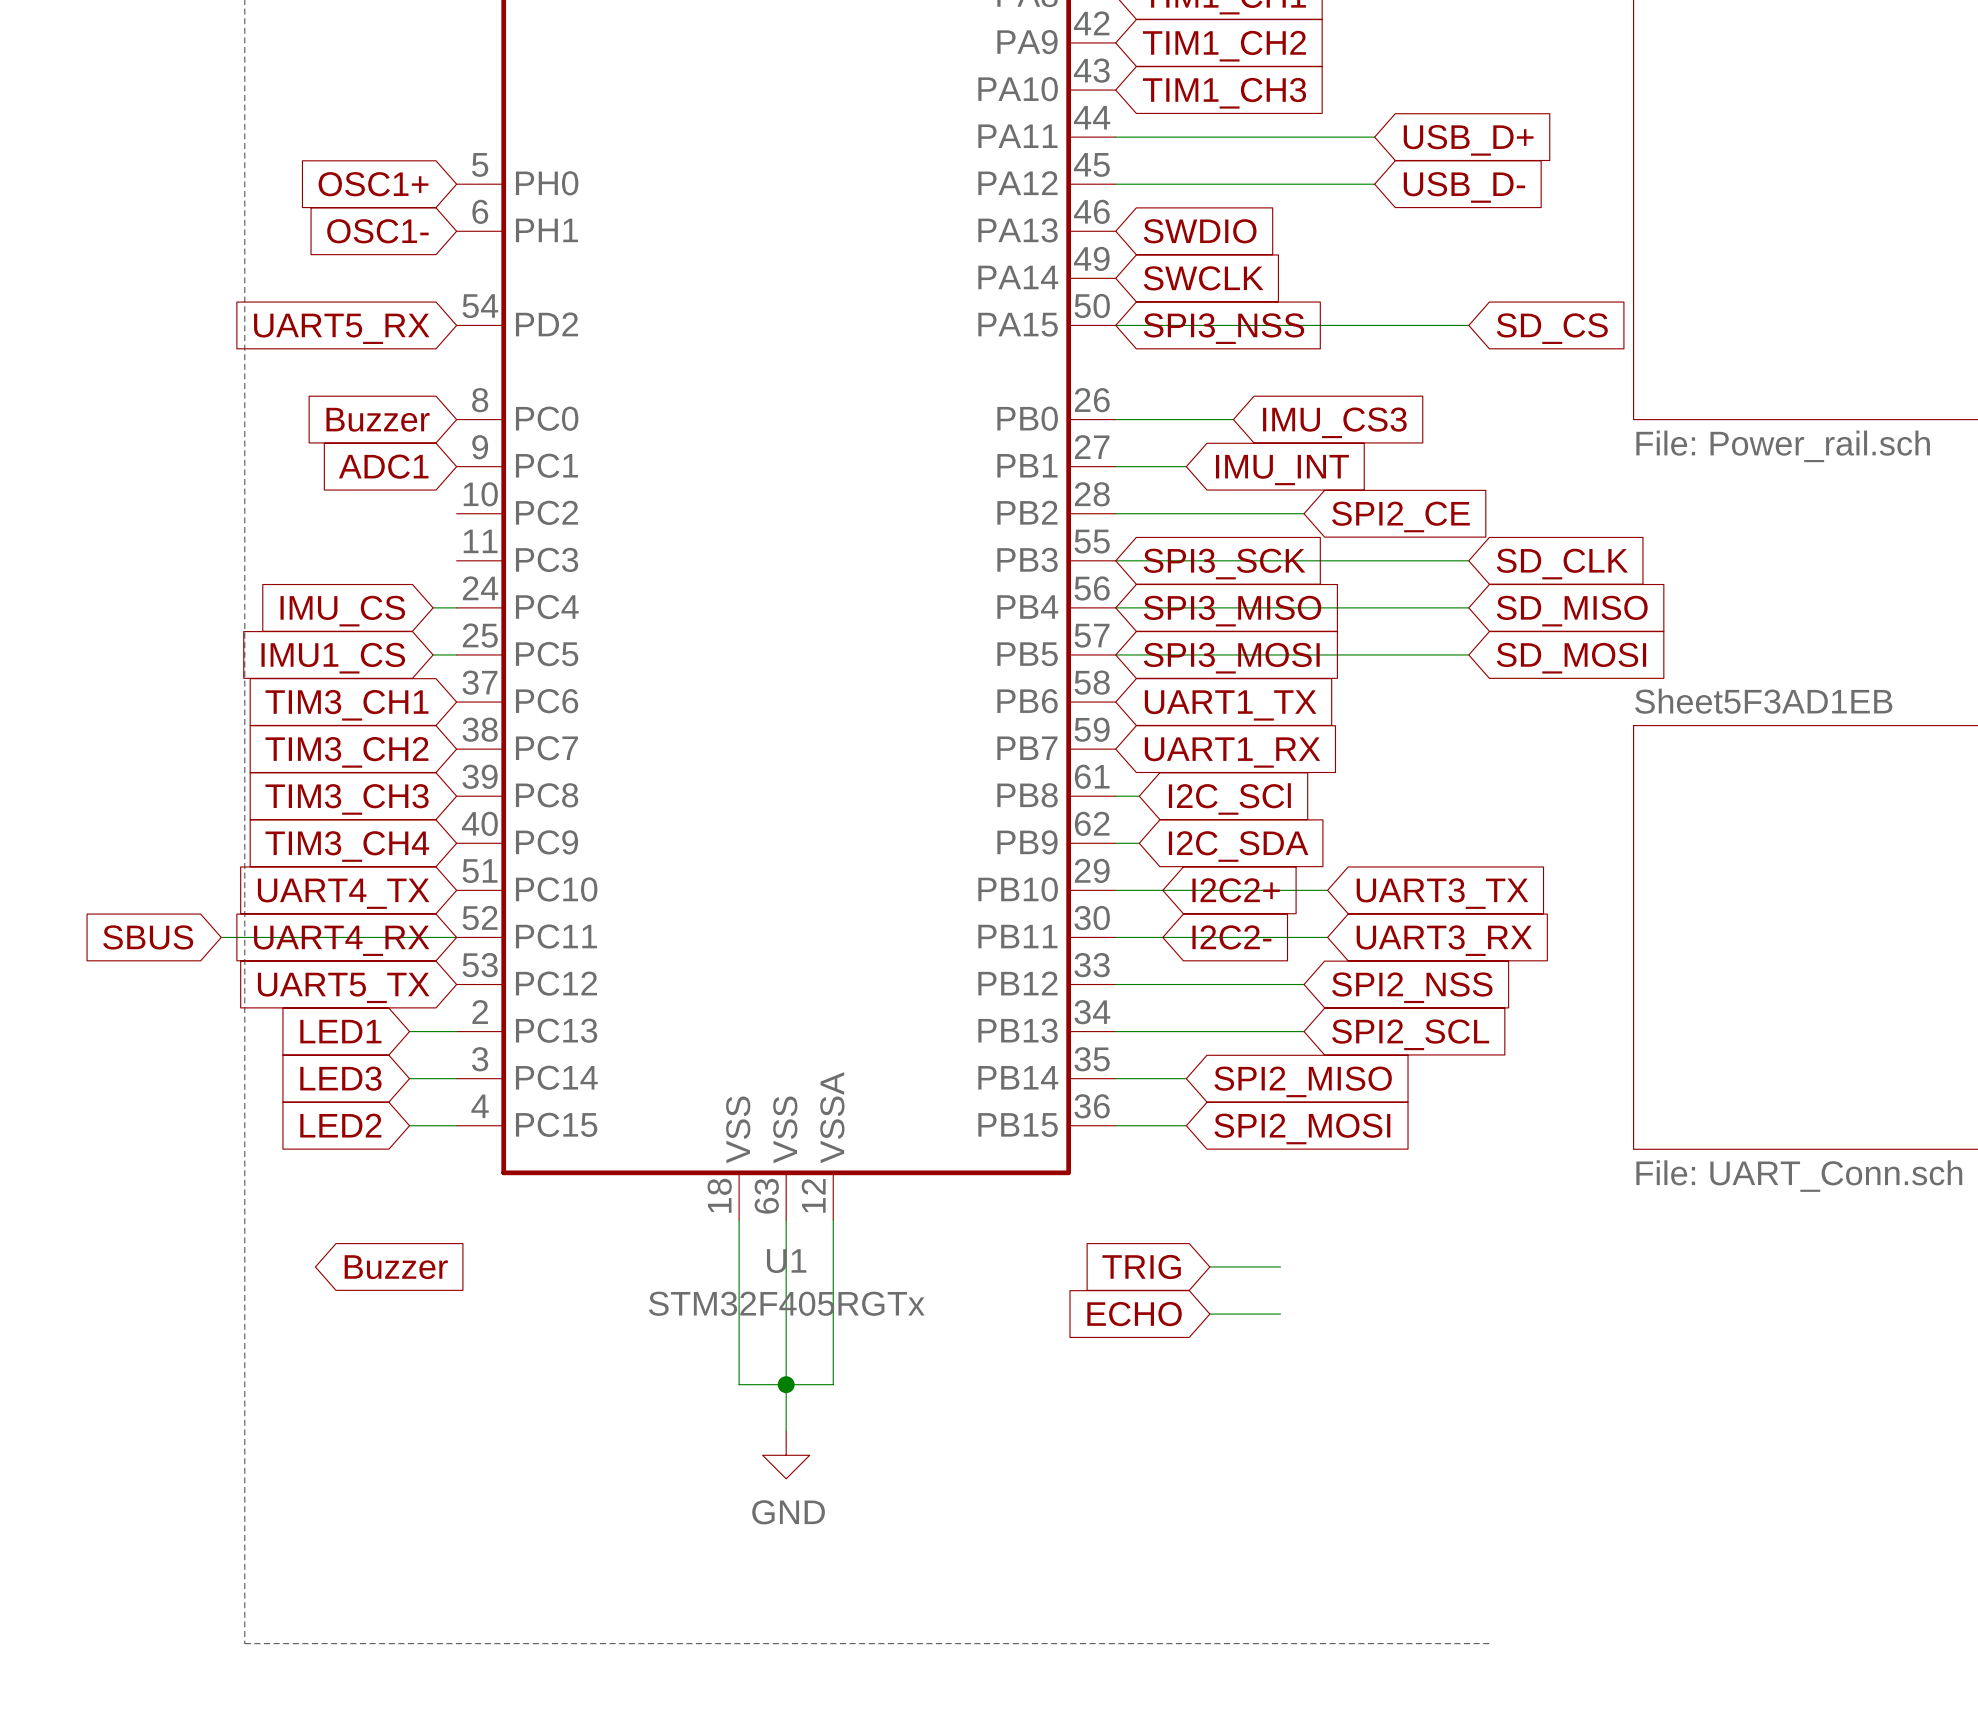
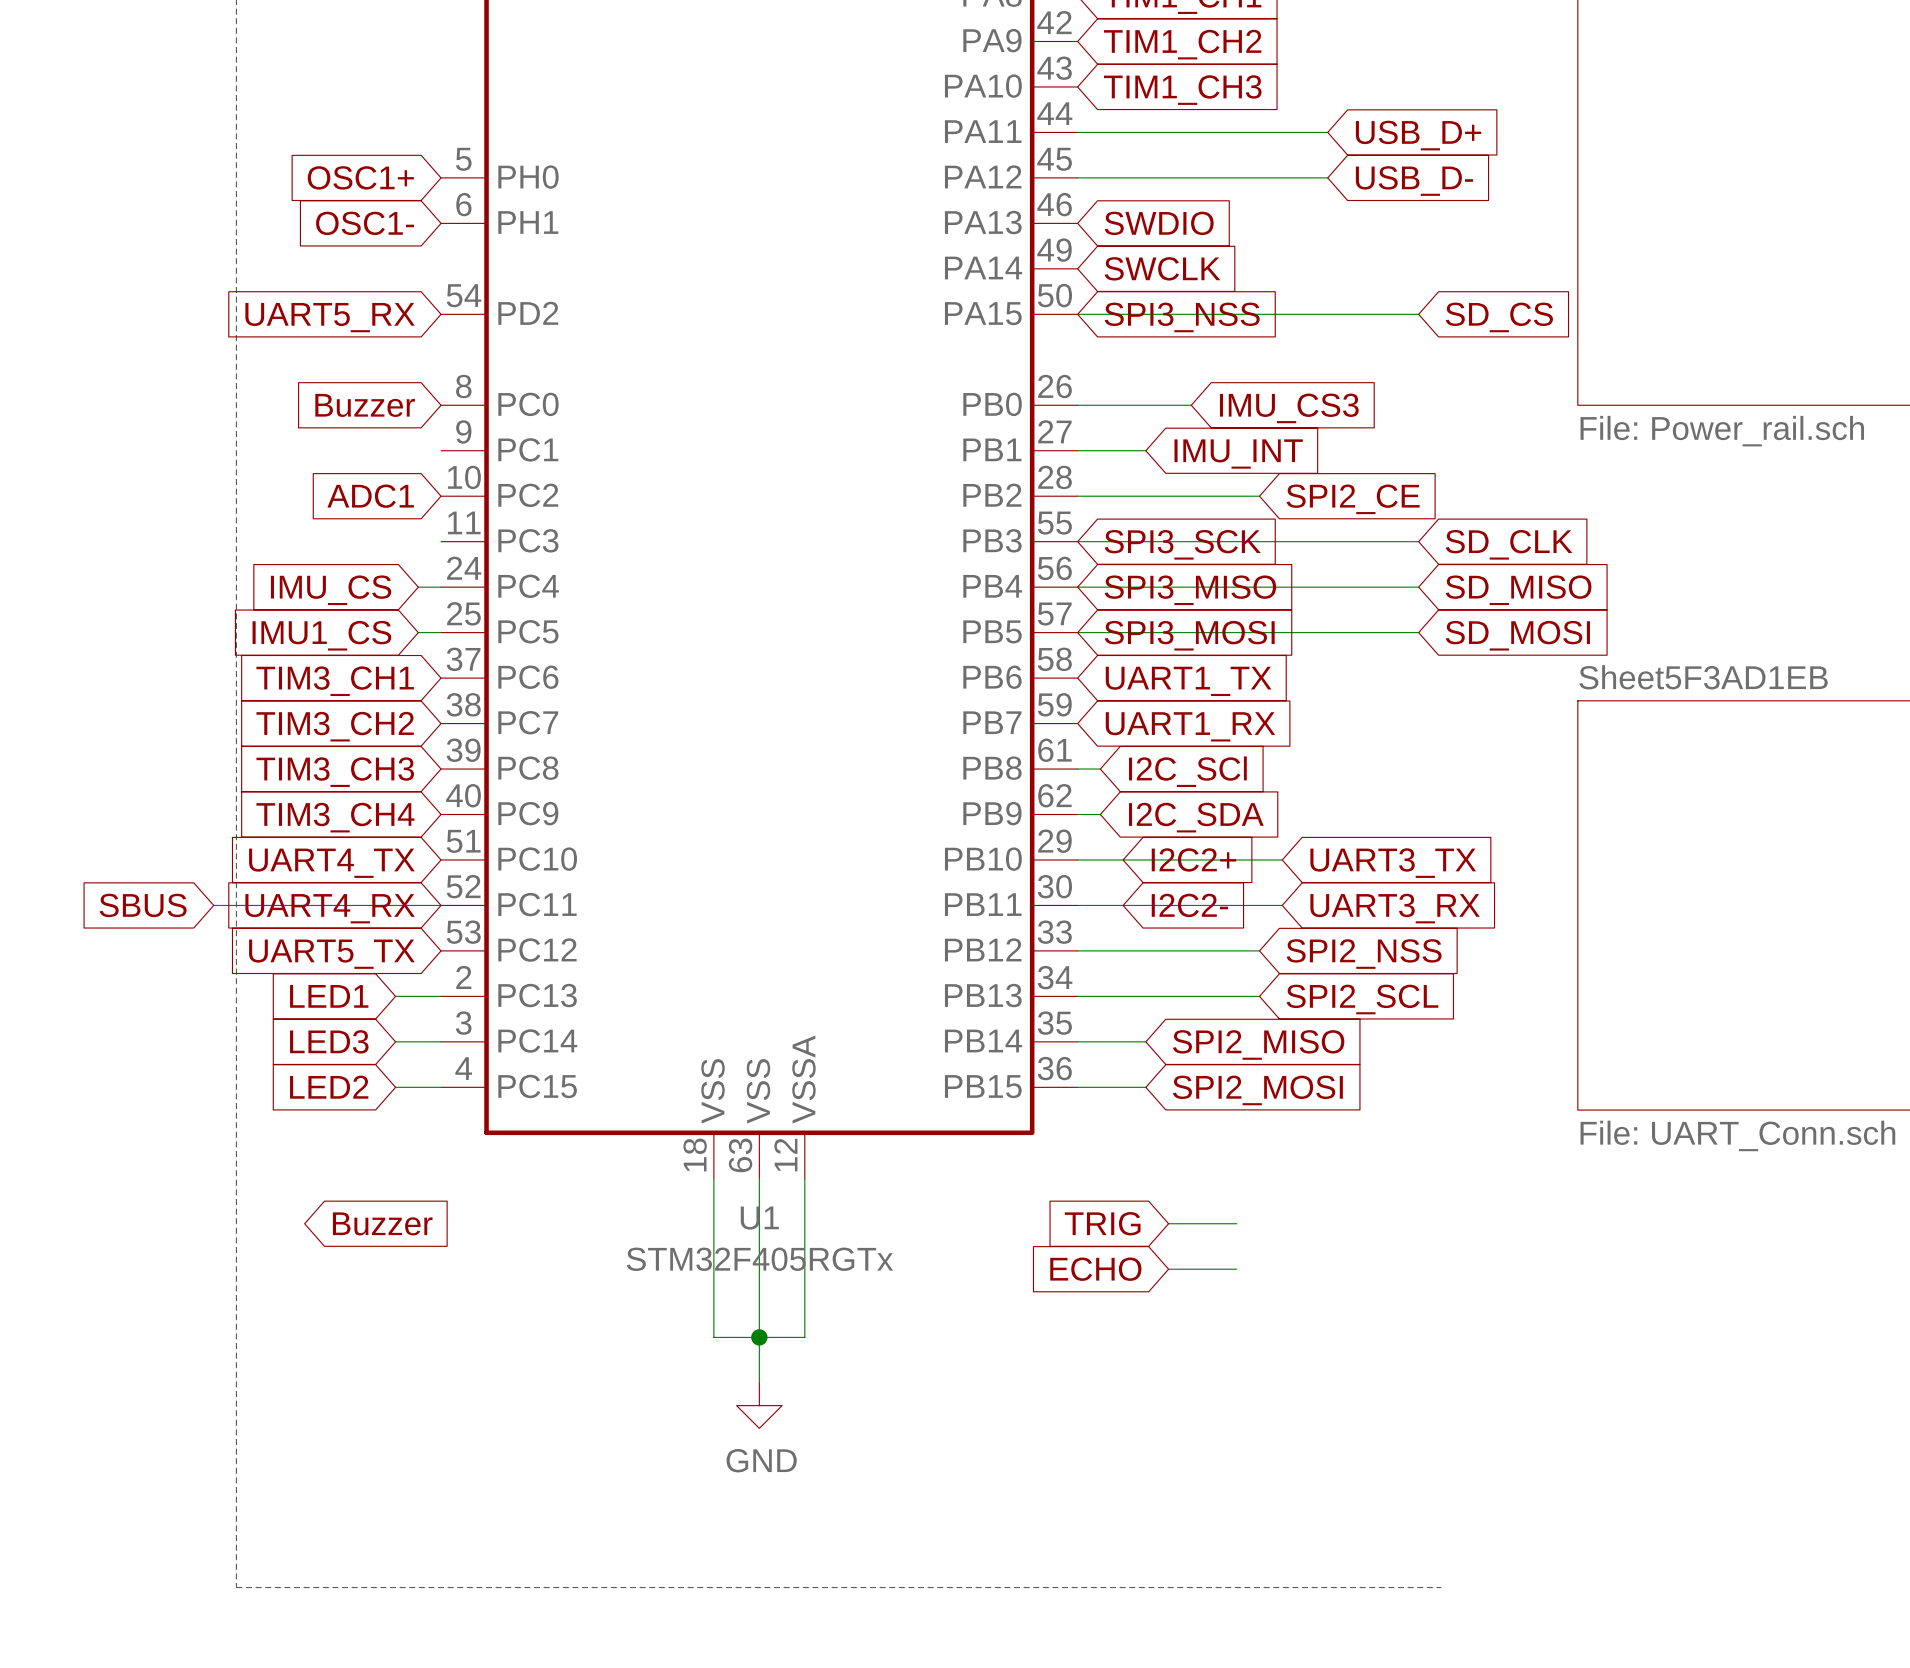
global label position: ADC1 (383, 466) -> ADC1 (370, 496)

